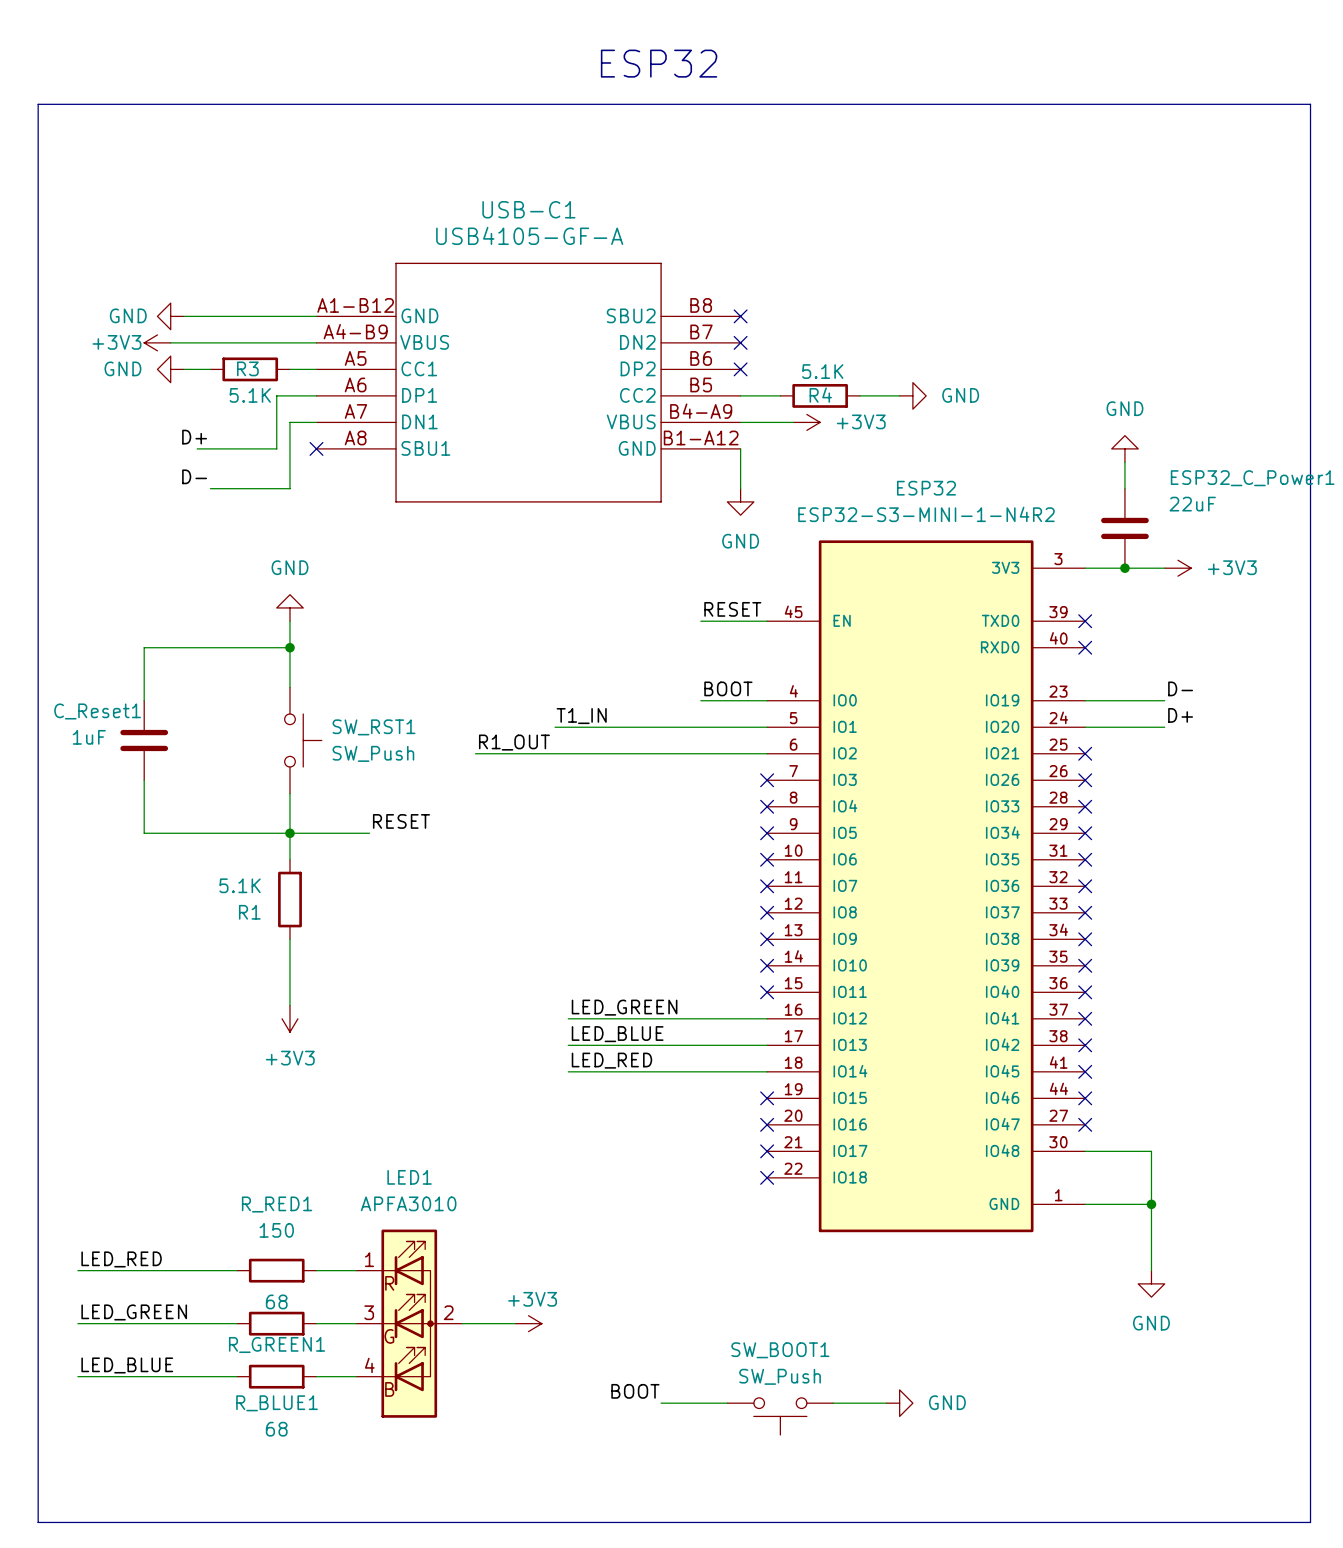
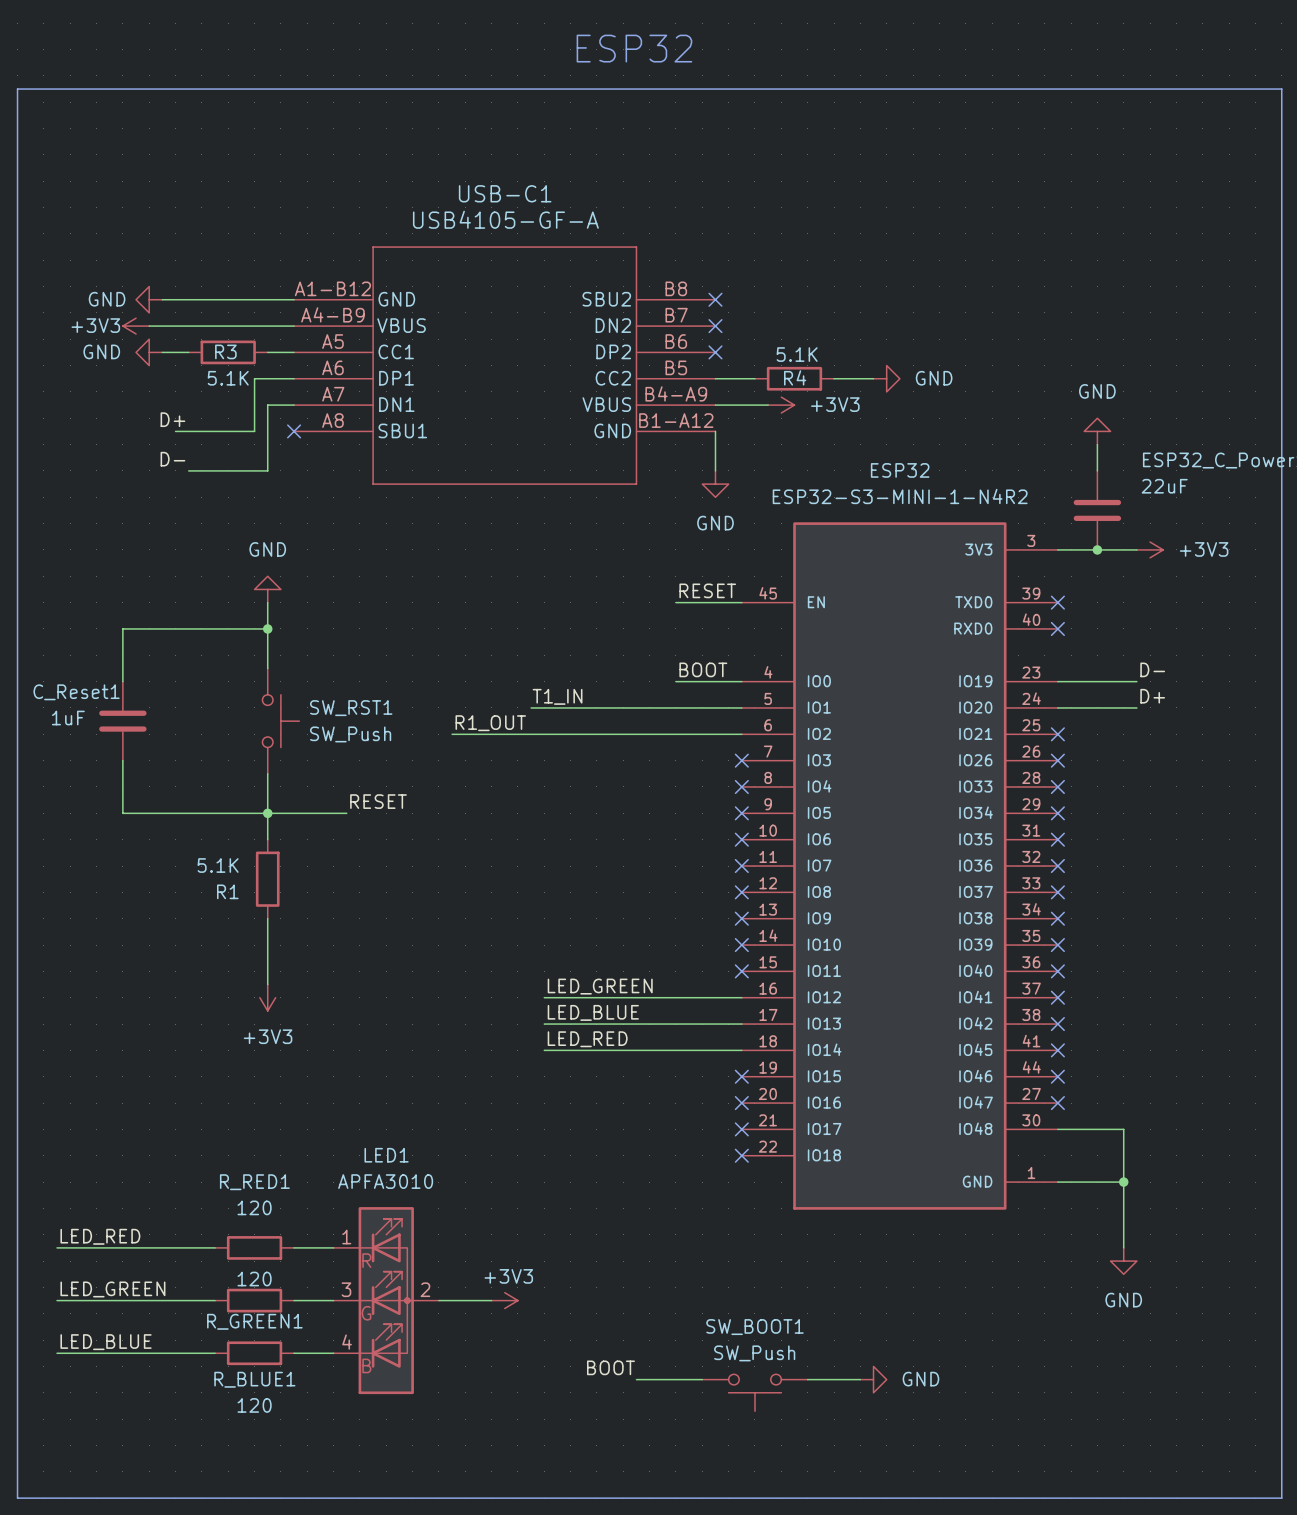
R_RED1 value: 150 (276, 1230) -> 120 (254, 1207)
R_GREEN1 value: 68 (276, 1301) -> 120 (254, 1279)
R_BLUE1 value: 68 (276, 1429) -> 120 (254, 1405)

